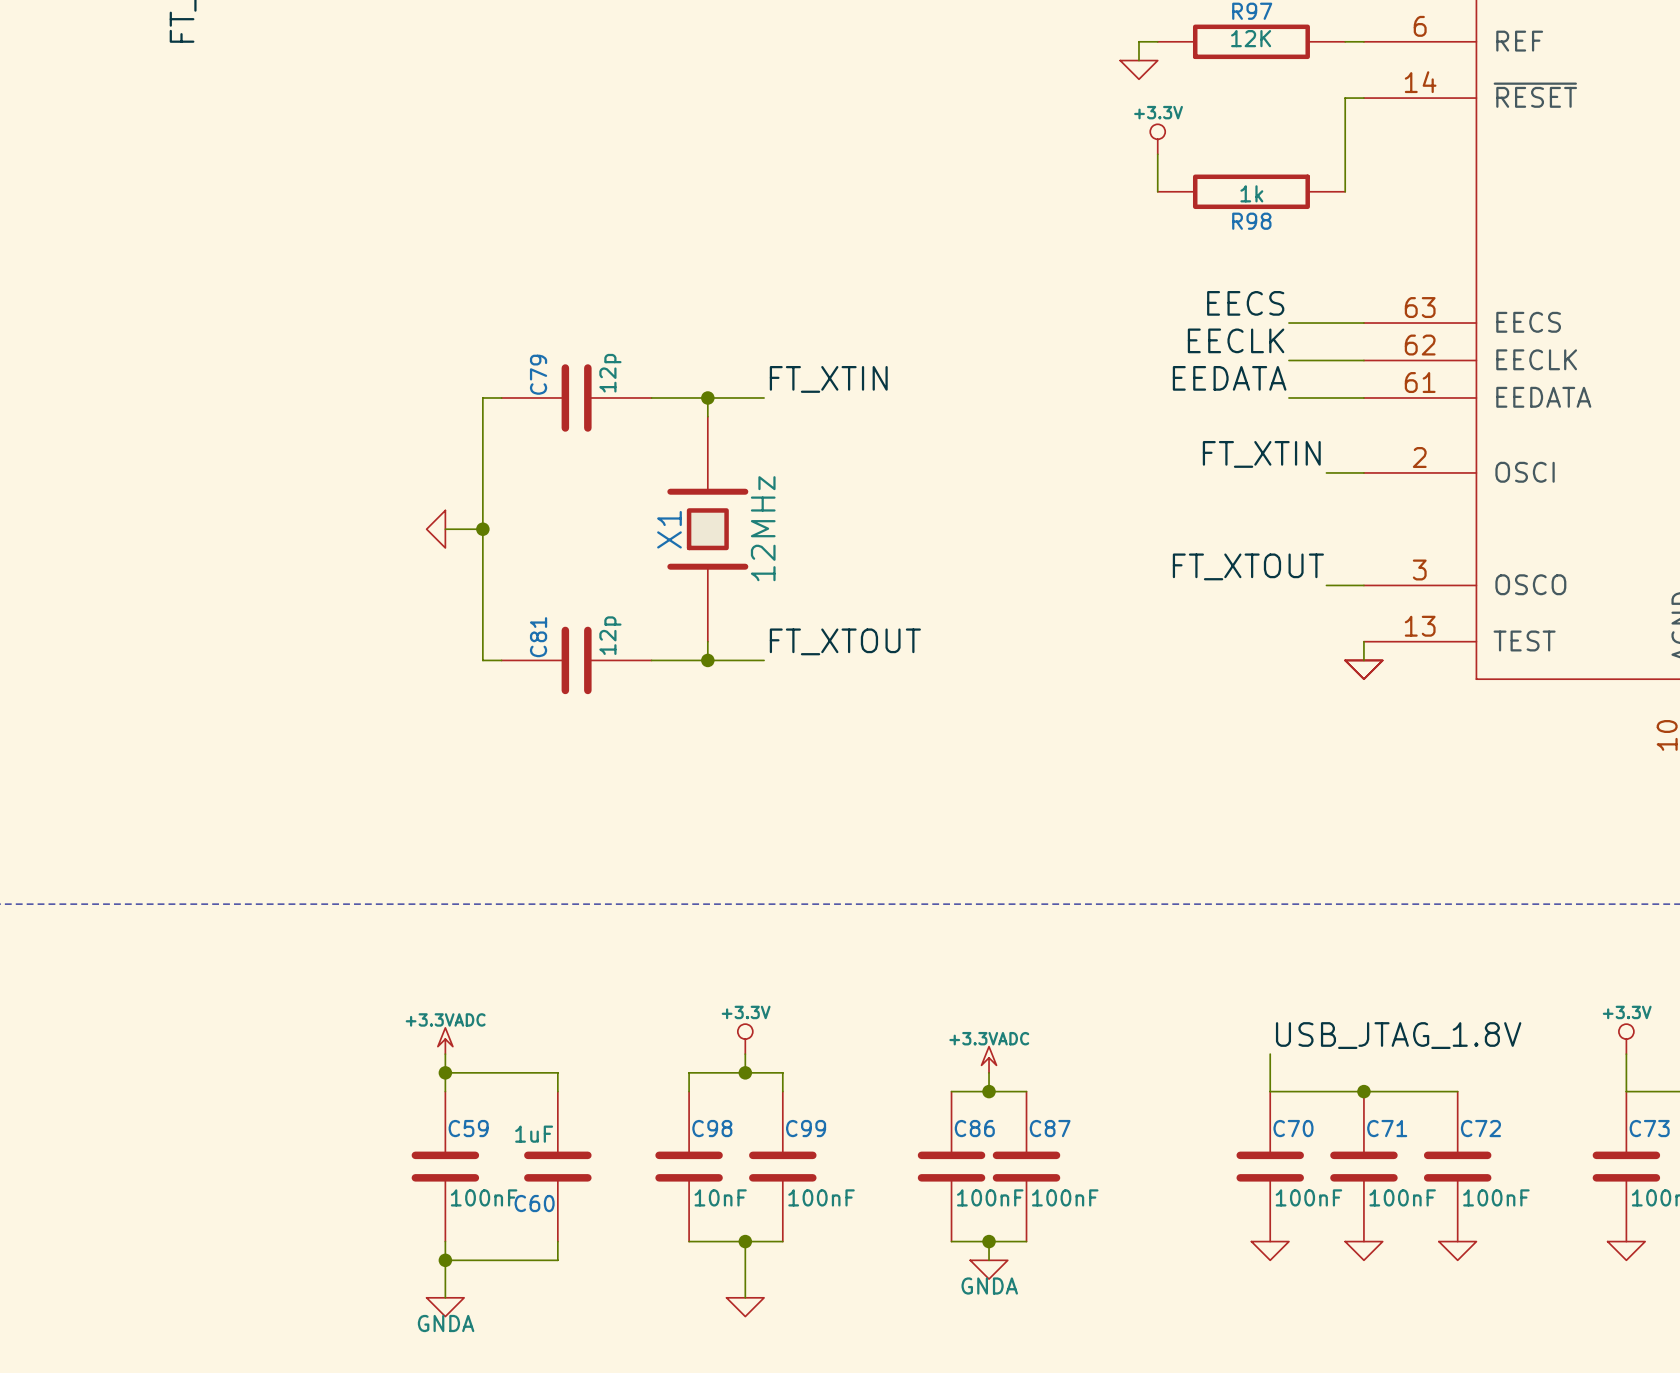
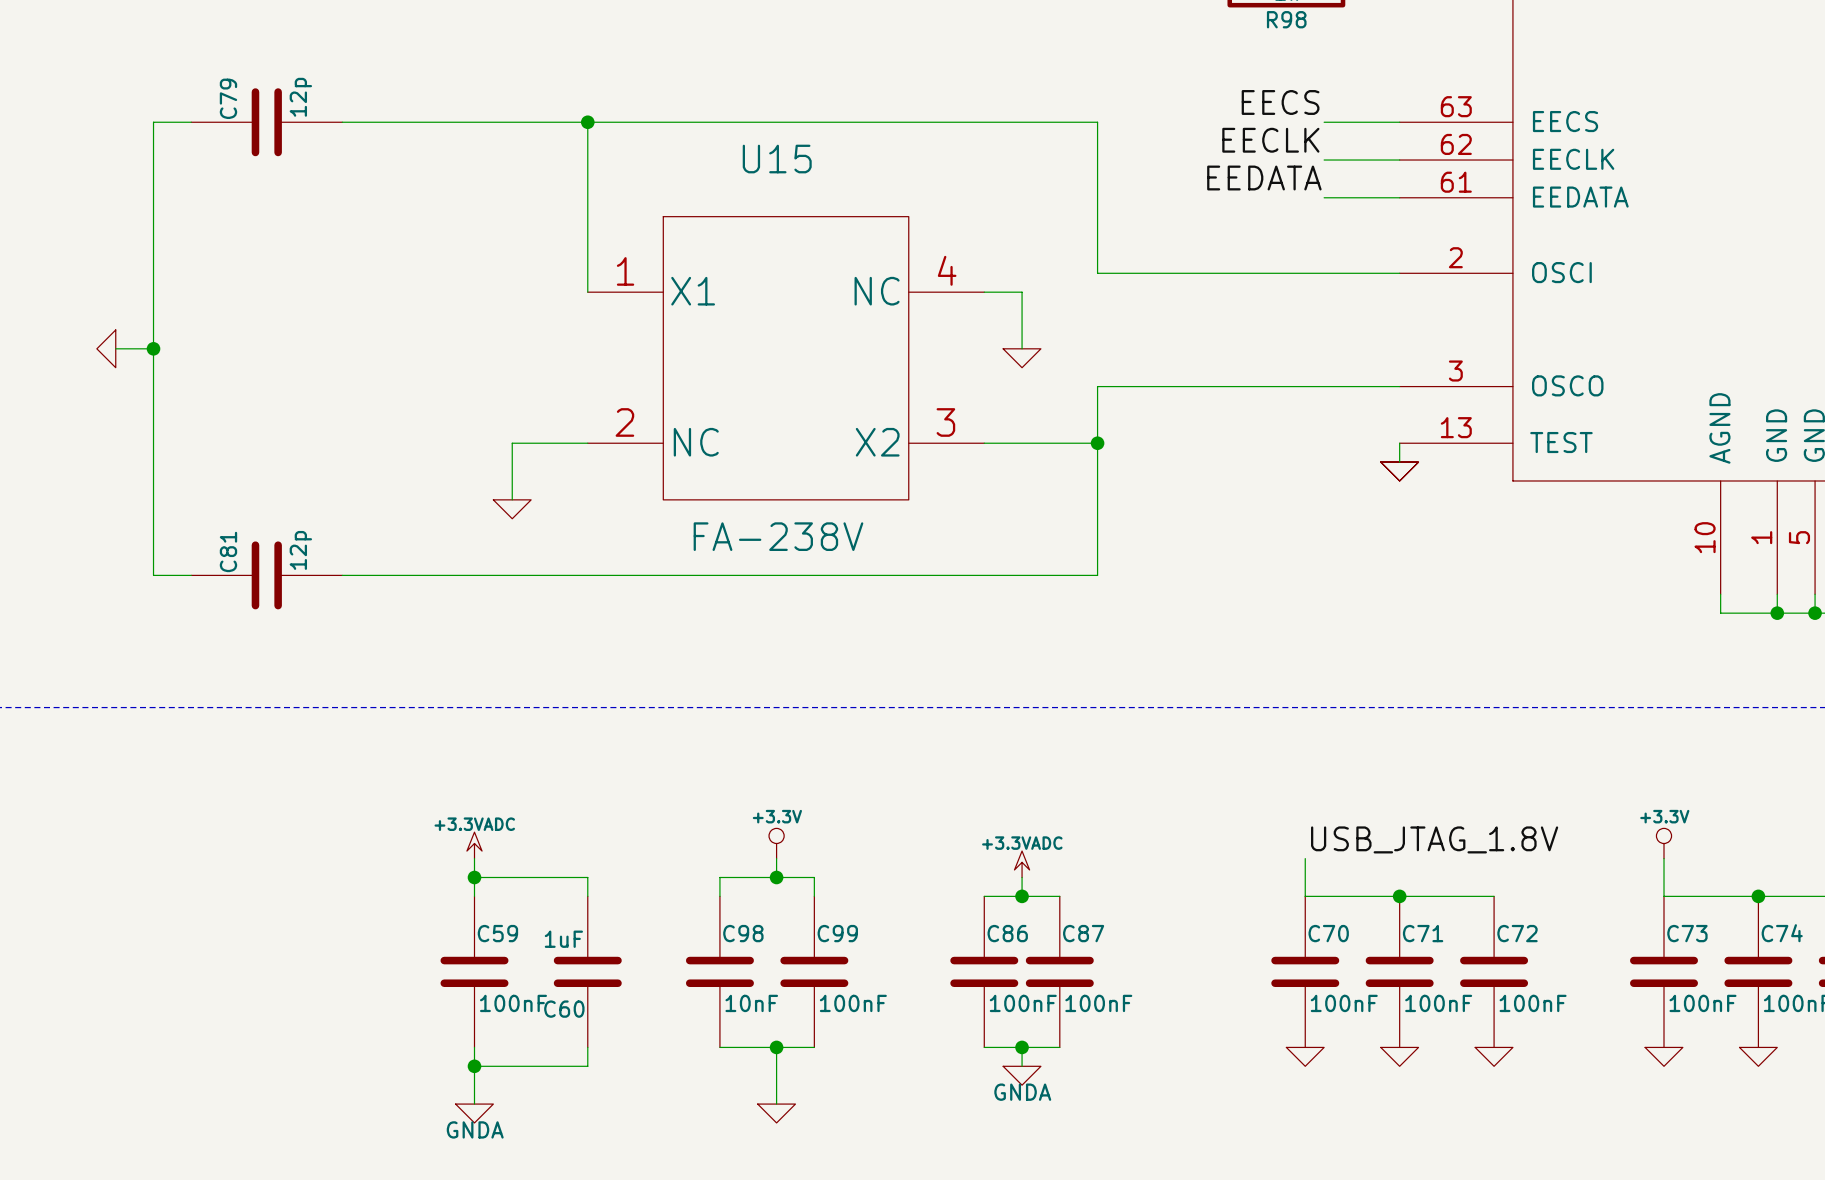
wire: none -> (191, 122) (153, 122) (153, 575) (191, 575)
wire: none -> (342, 122) (1097, 122) (1097, 273) (1361, 273)
wire: none -> (587, 122) (587, 292)
junction: none -> (587, 122)
label: FT_XTIN (828, 379) -> none
wire: (501, 397) (482, 397) (482, 641) -> (587, 443) (512, 443)
C79 position: (576, 397) -> (266, 122)
wire: (651, 397) (764, 397) -> none
wire: (707, 397) (707, 416) -> none
junction: (707, 397) -> none
label: FT_XTIN (1261, 454) -> none
wire: none -> (984, 292) (1022, 292) (1022, 348)
power symbol: (436, 529) -> none
wire: (445, 529) (482, 529) -> (115, 348) (153, 348)
junction: (482, 529) -> none
X1: 12MHz (707, 529) -> none
power symbol: none -> (106, 348)
junction: none -> (153, 348)
U15: none -> FA-238V (786, 358)
power symbol: none -> (1022, 358)
label: FT_XTOUT (1248, 566) -> none
wire: none -> (1361, 386) (1097, 386) (1097, 575) (342, 575)
wire: (707, 641) (707, 660) -> none
label: FT_XTOUT (845, 641) -> none
junction: none -> (1097, 443)
wire: (482, 660) (501, 660) -> (512, 462) (512, 499)
C81 position: (576, 660) -> (266, 575)
wire: (651, 660) (764, 660) -> (984, 443) (1097, 443)
junction: (707, 660) -> none
power symbol: none -> (512, 509)

